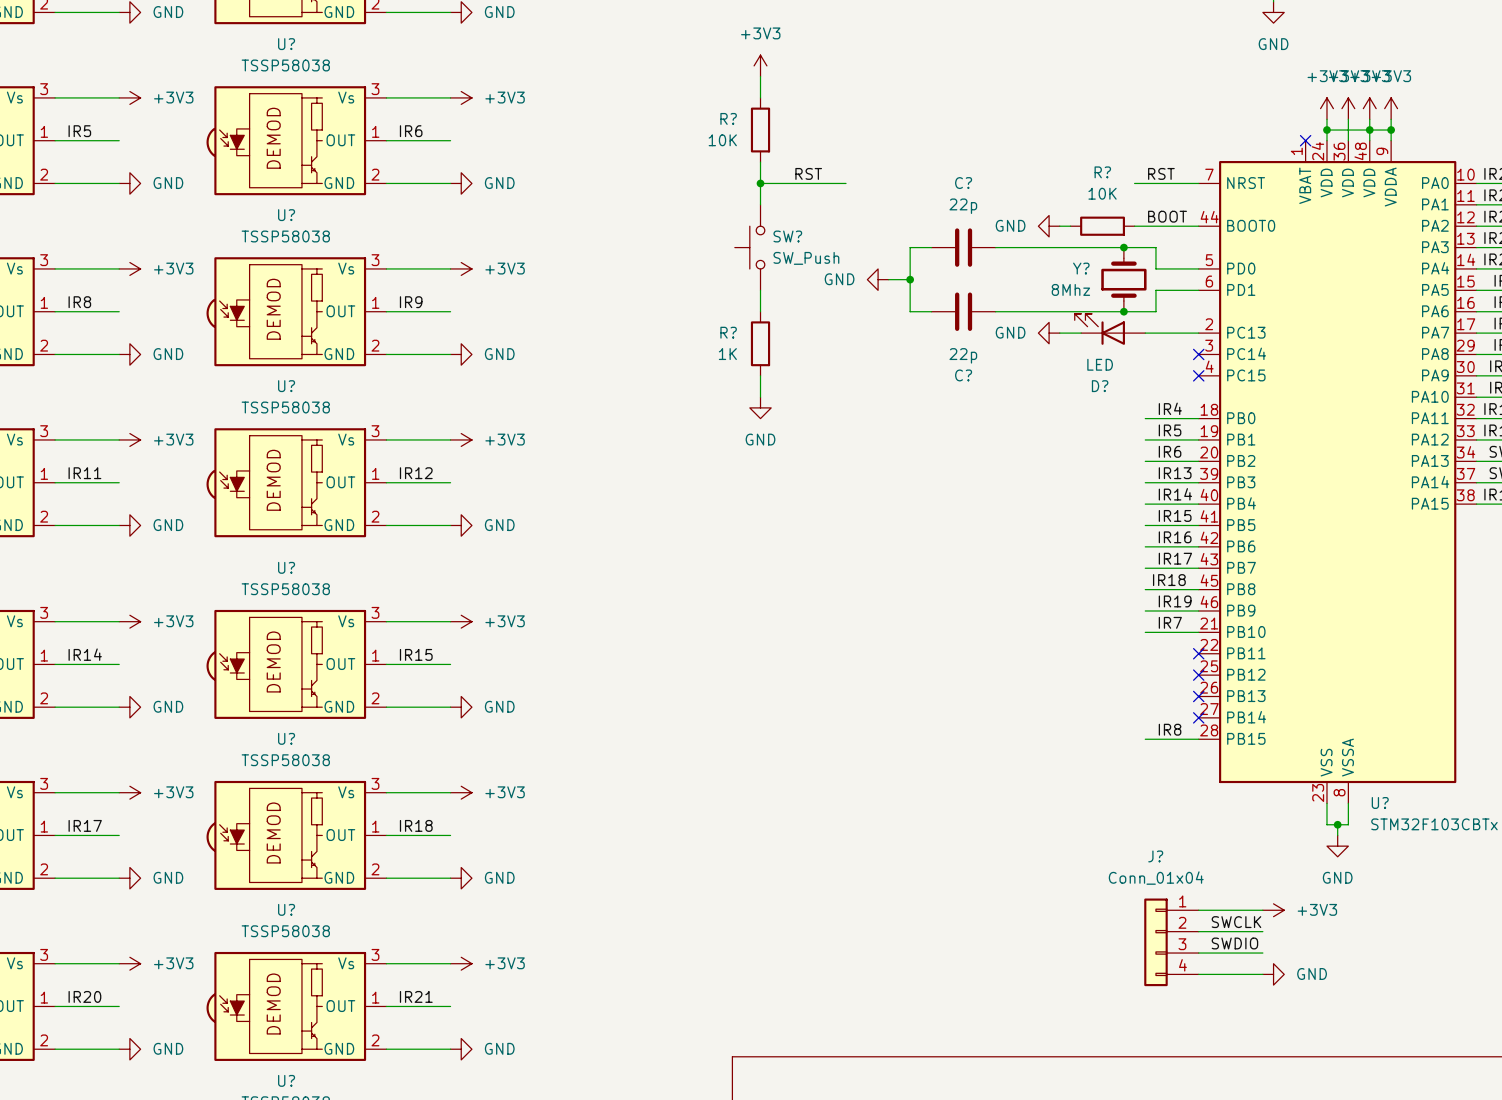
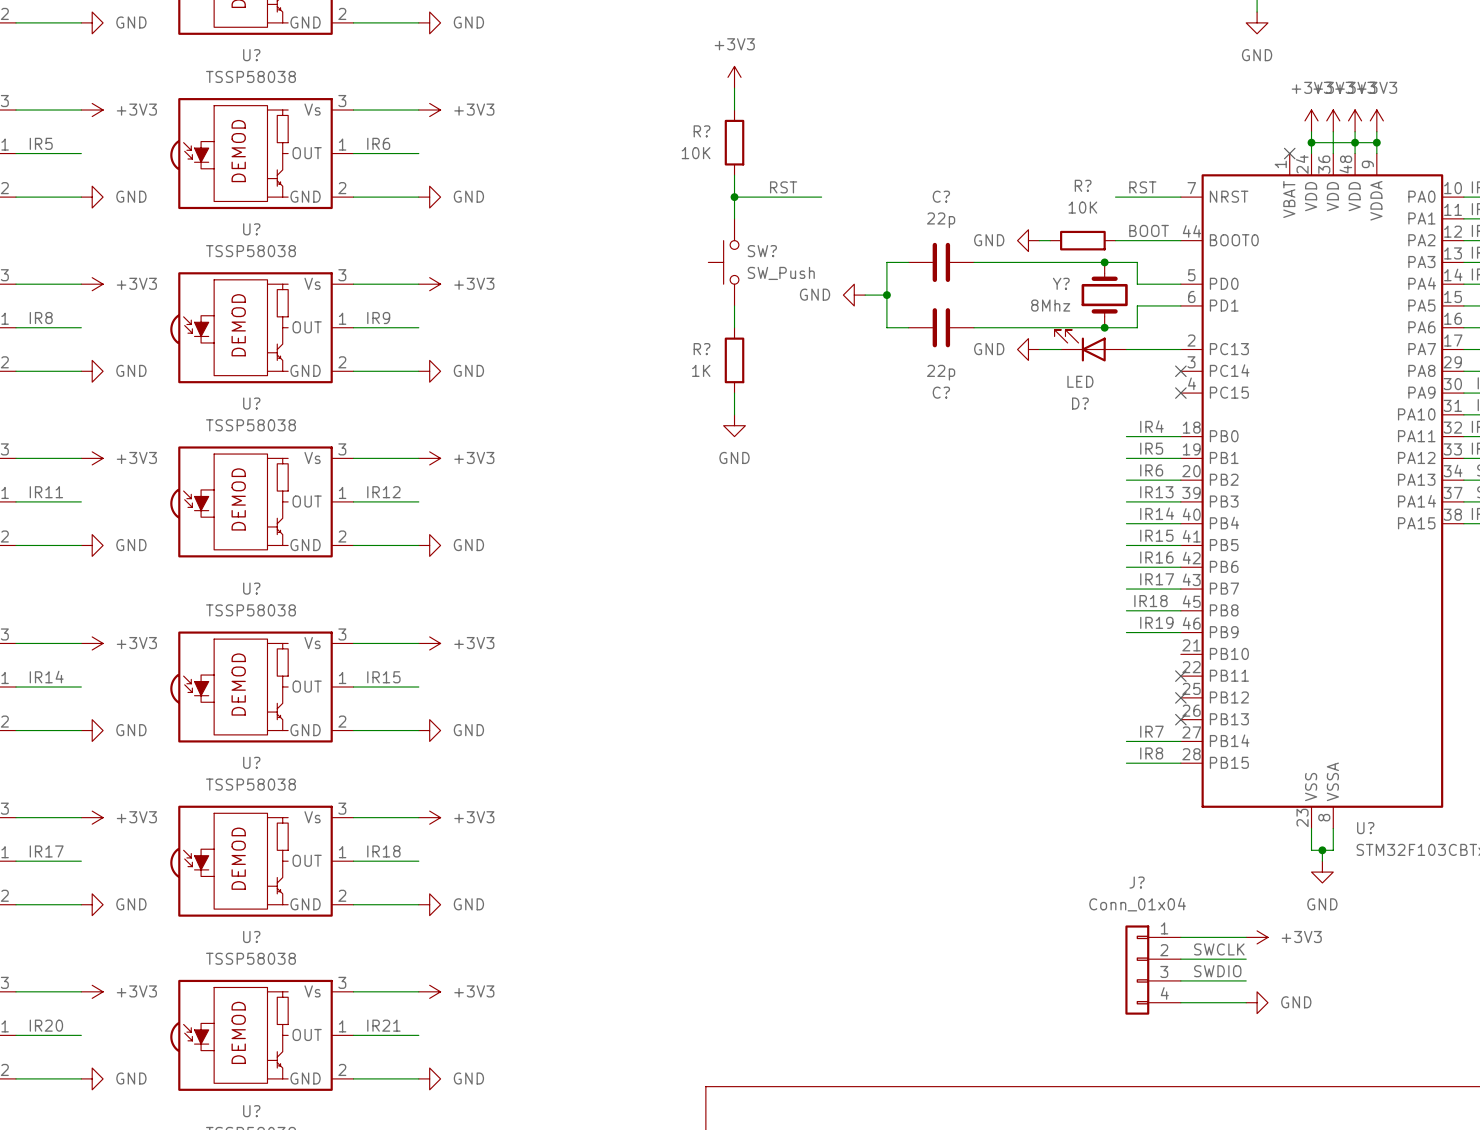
label position: IR7 (1170, 622) -> IR7 (1151, 731)
wire: (1145, 632) (1198, 632) -> (1126, 741) (1180, 741)
no-connect mark: (1198, 717) -> none

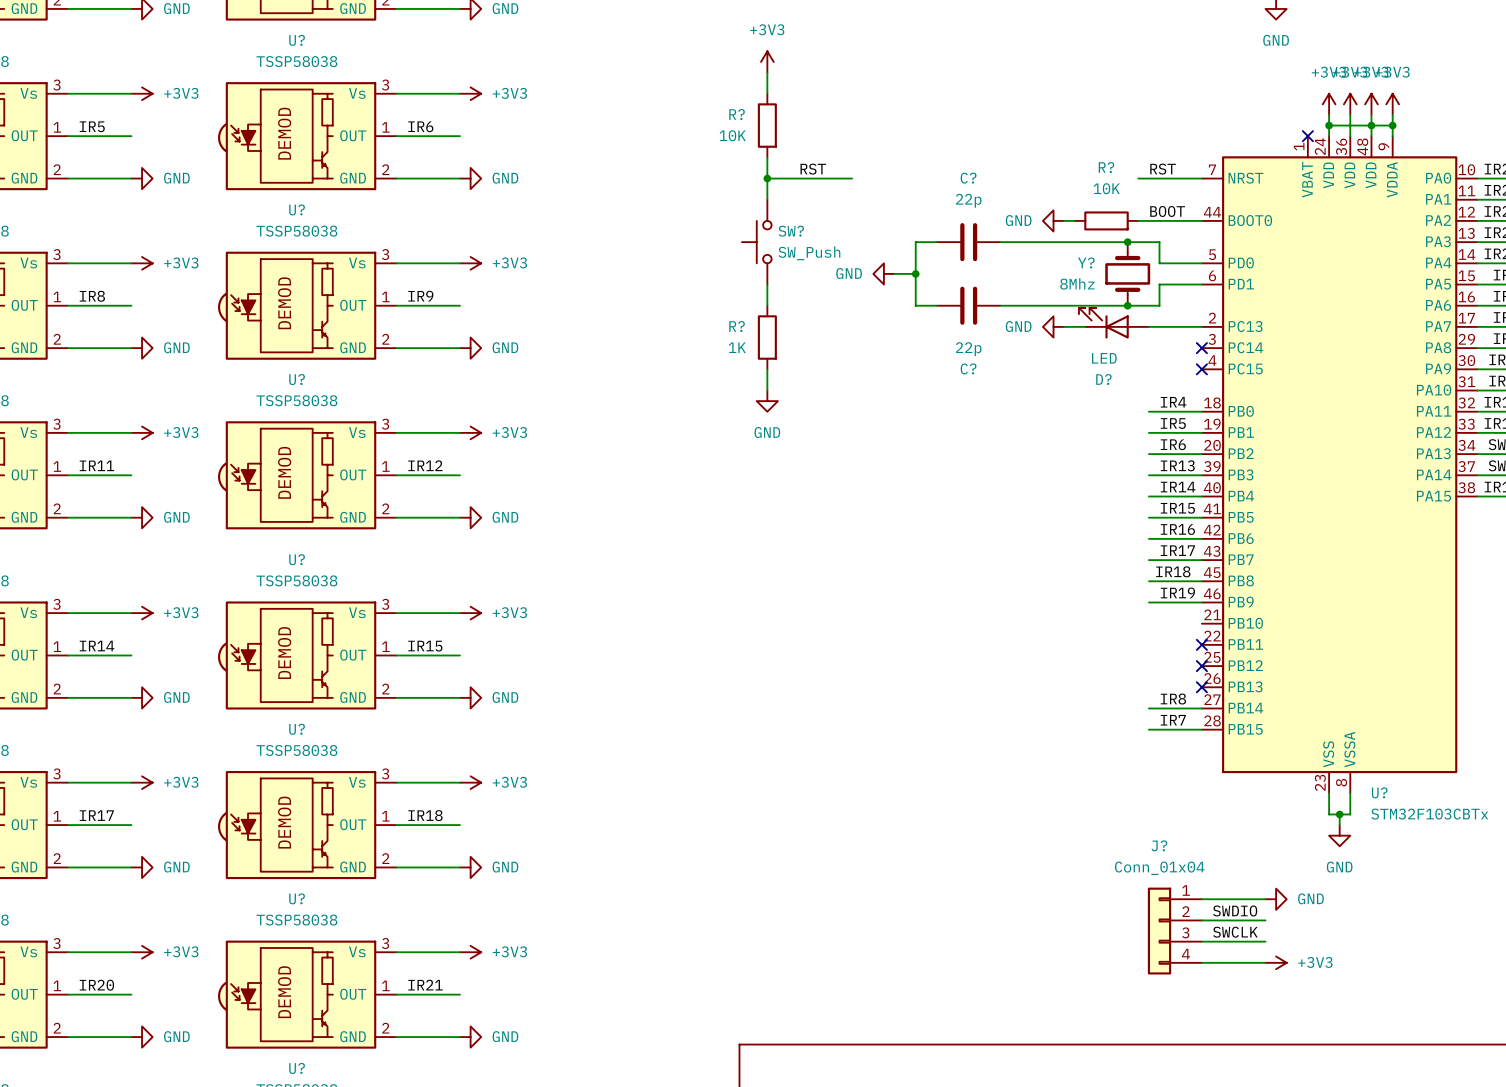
label: IR7 (1151, 731) -> IR8 (1173, 699)
label: IR8 (1151, 753) -> IR7 (1173, 720)
power symbol: +3V3 (1257, 937) -> GND (1276, 899)
label: SWCLK (1219, 949) -> SWDIO (1235, 910)
label: SWDIO (1217, 971) -> SWCLK (1235, 932)
power symbol: GND (1257, 1002) -> +3V3 (1276, 962)

